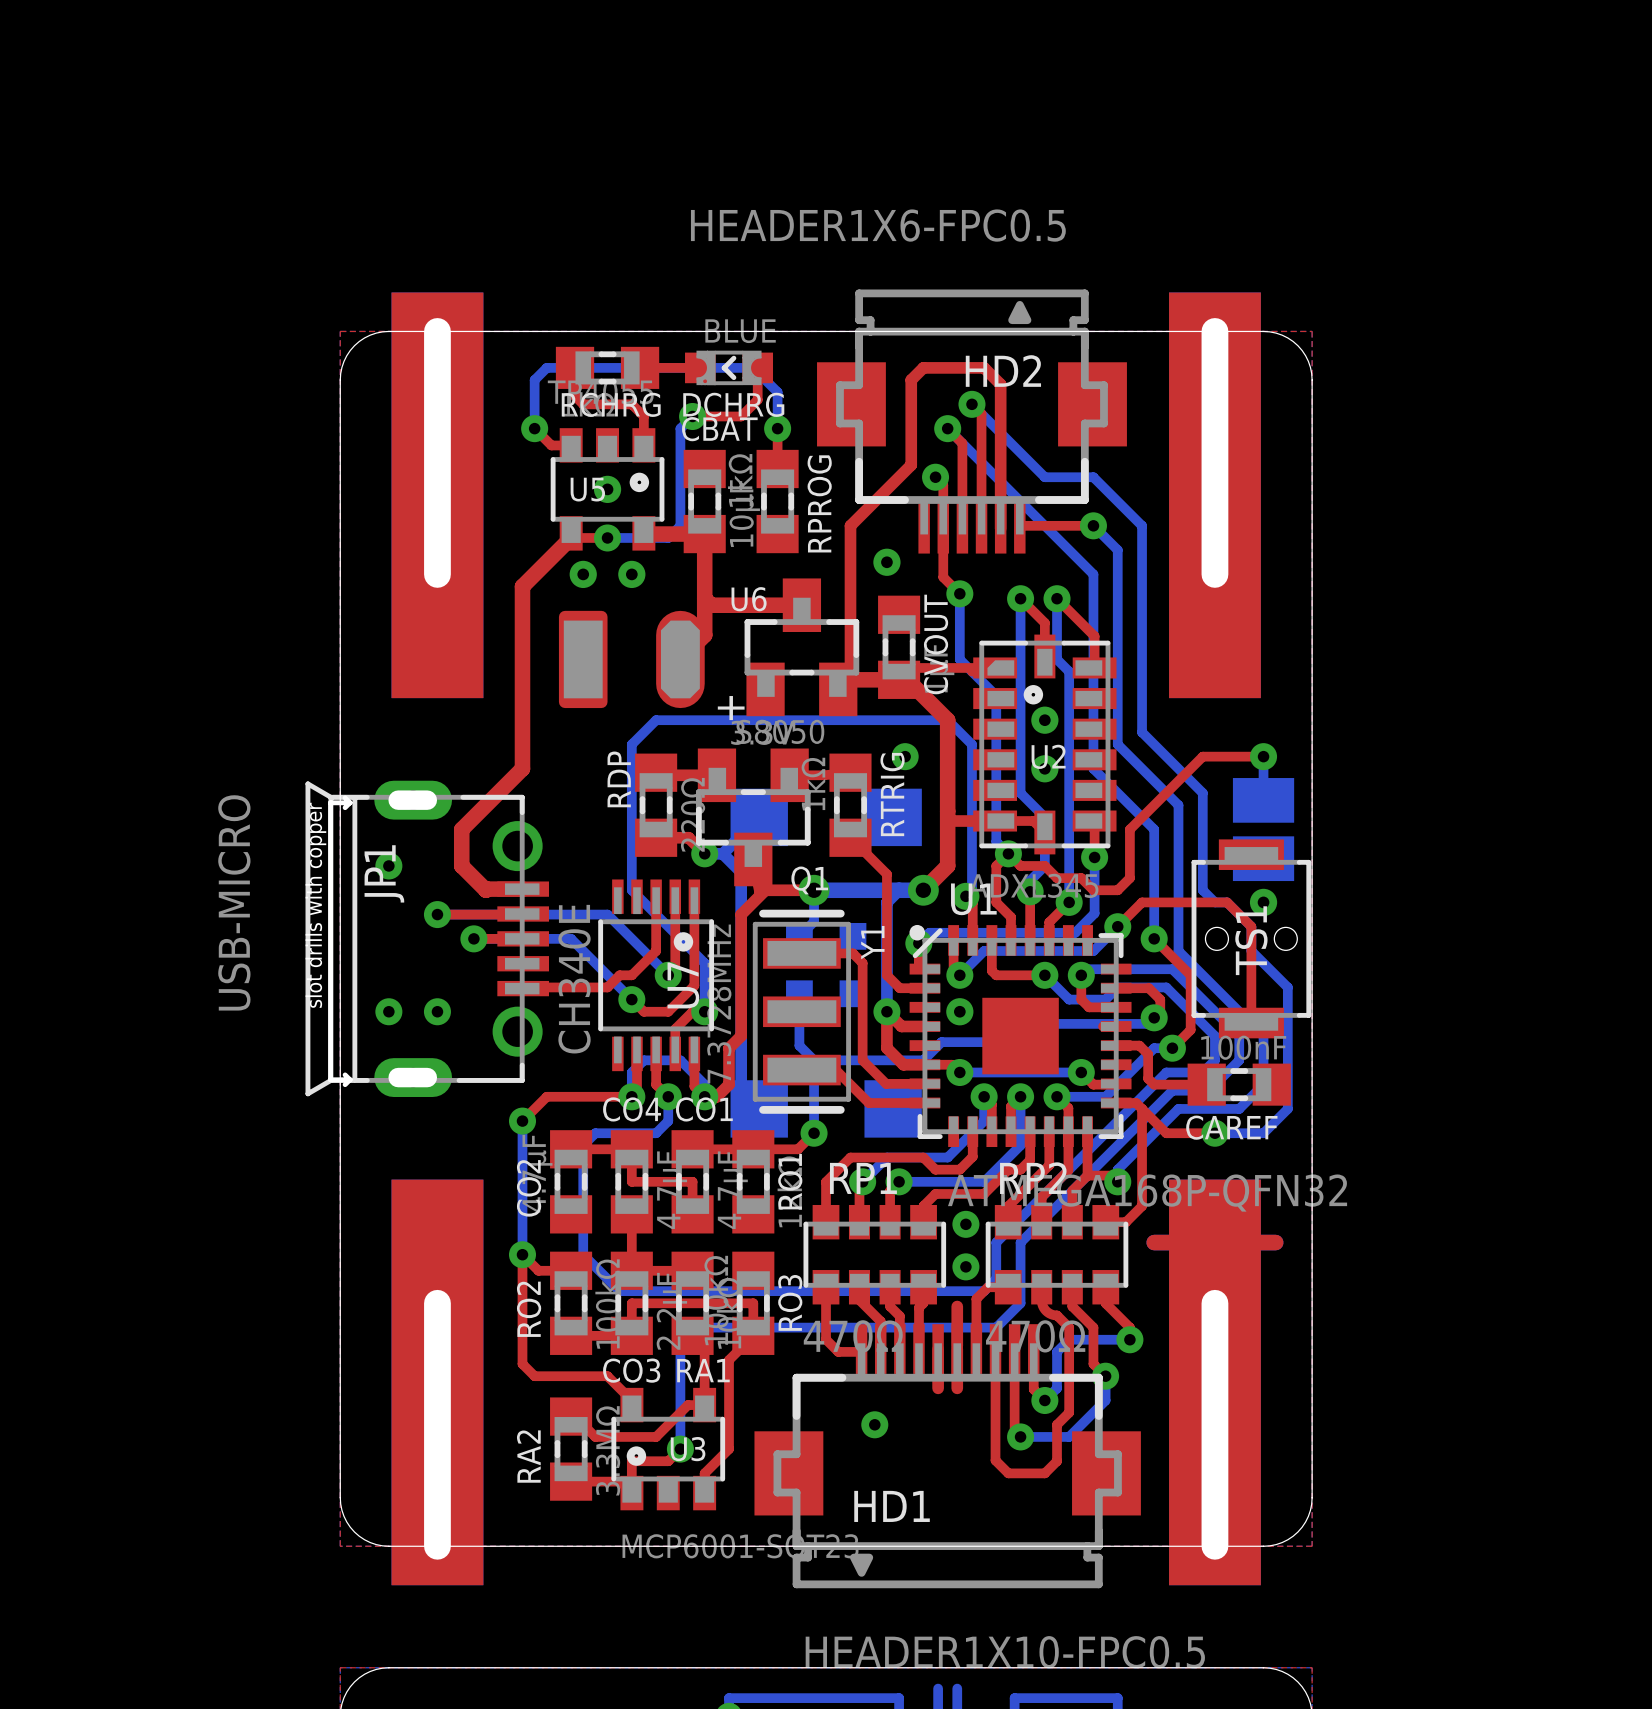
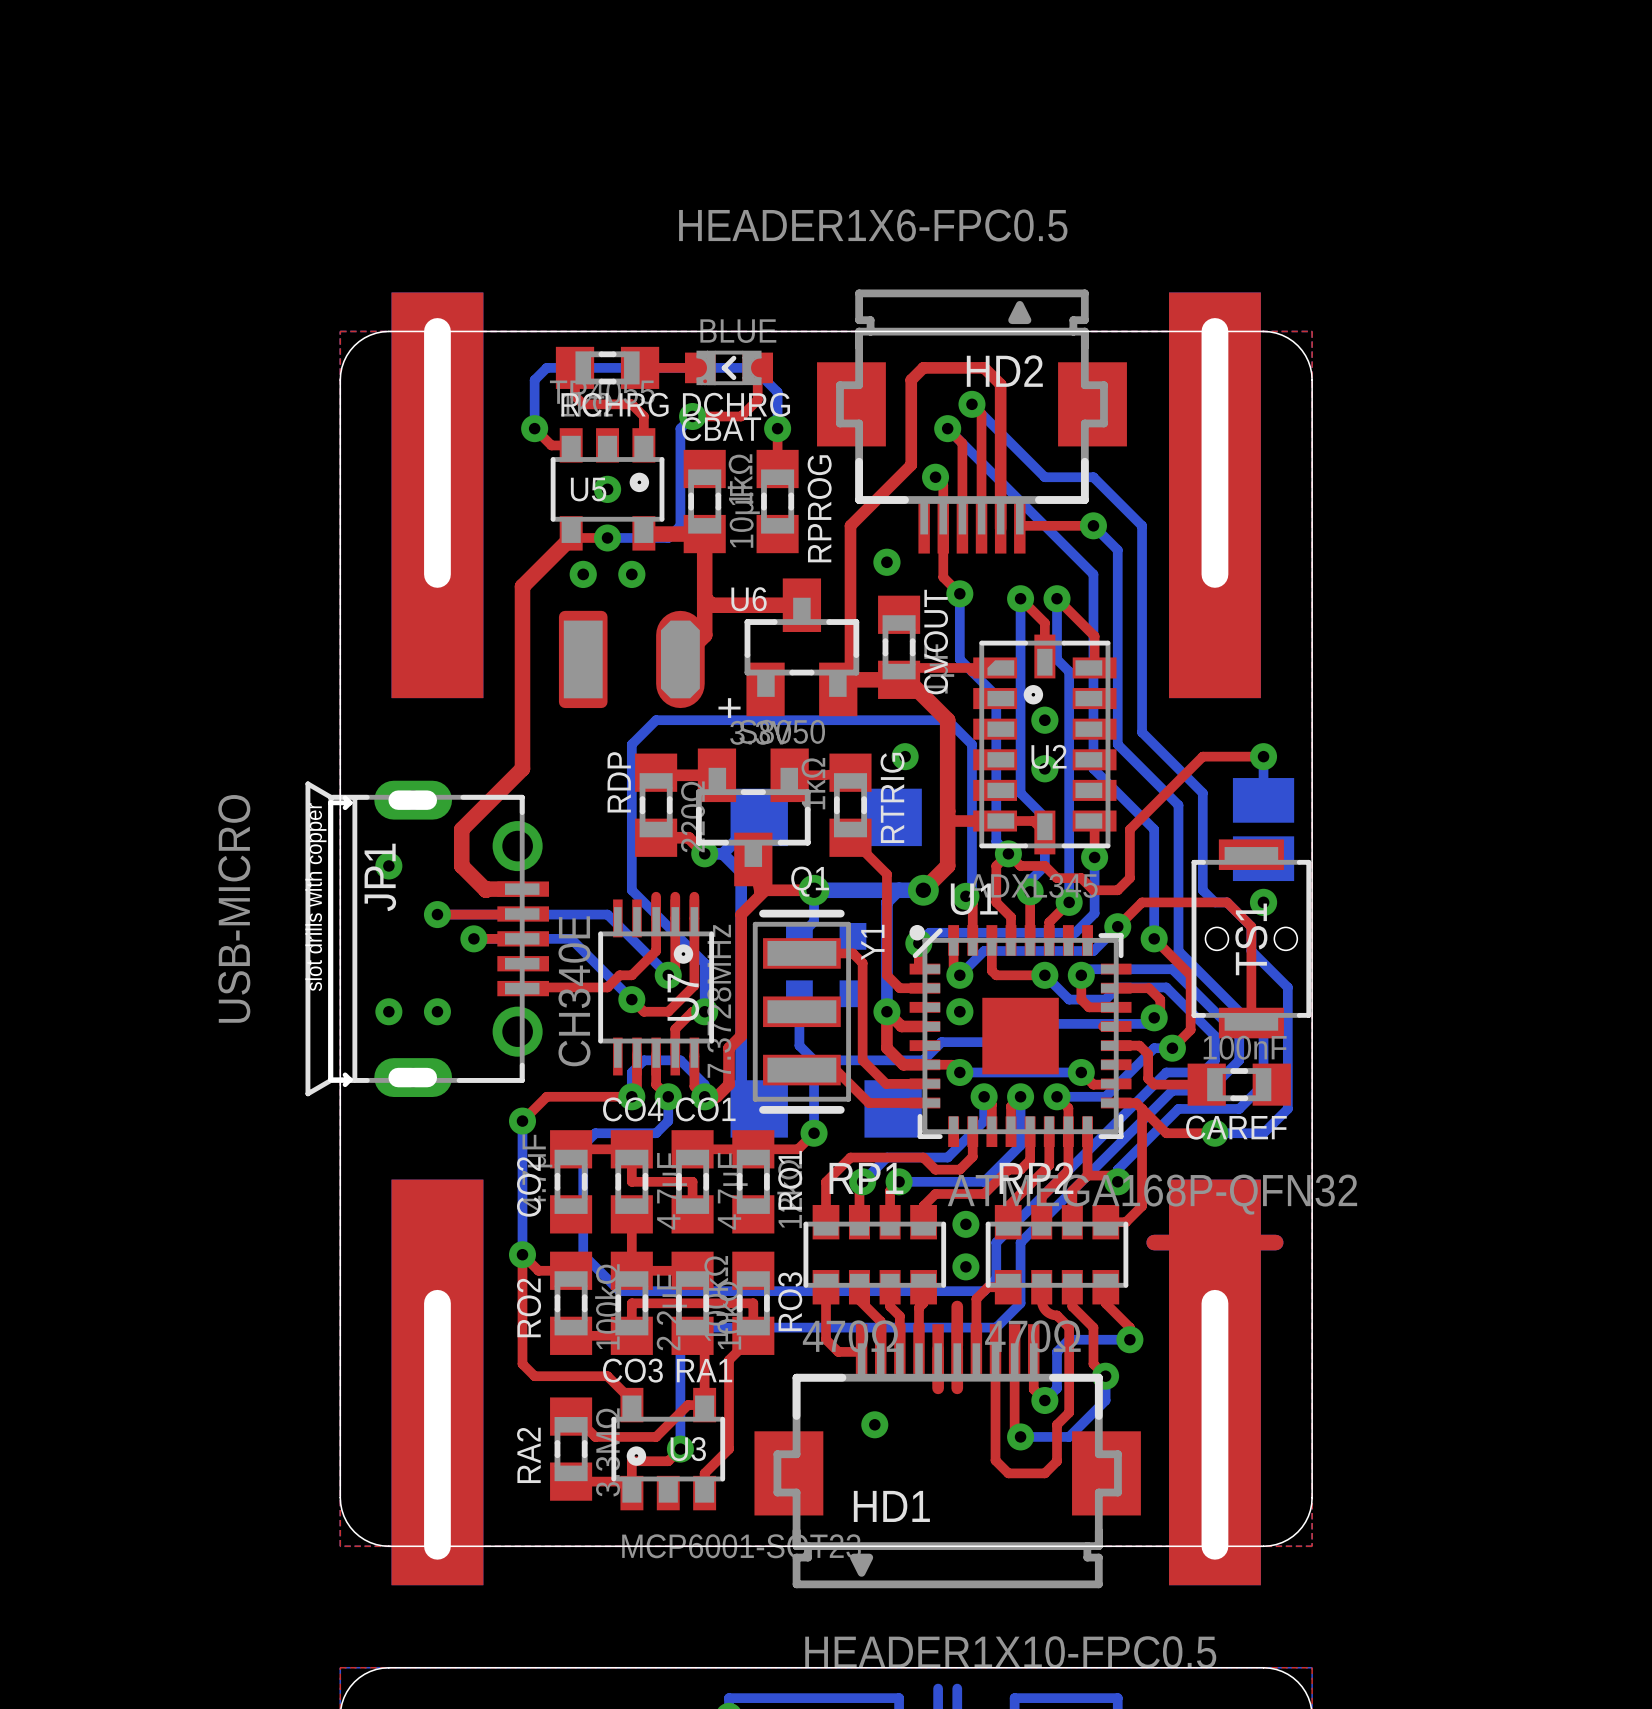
U7 footprint: [598, 879, 715, 1072] -> [598, 899, 715, 1076]
U7 value position: CH340E (574, 979) -> CH340E (574, 991)
U7 name position: U7 (683, 985) -> U7 (683, 997)

